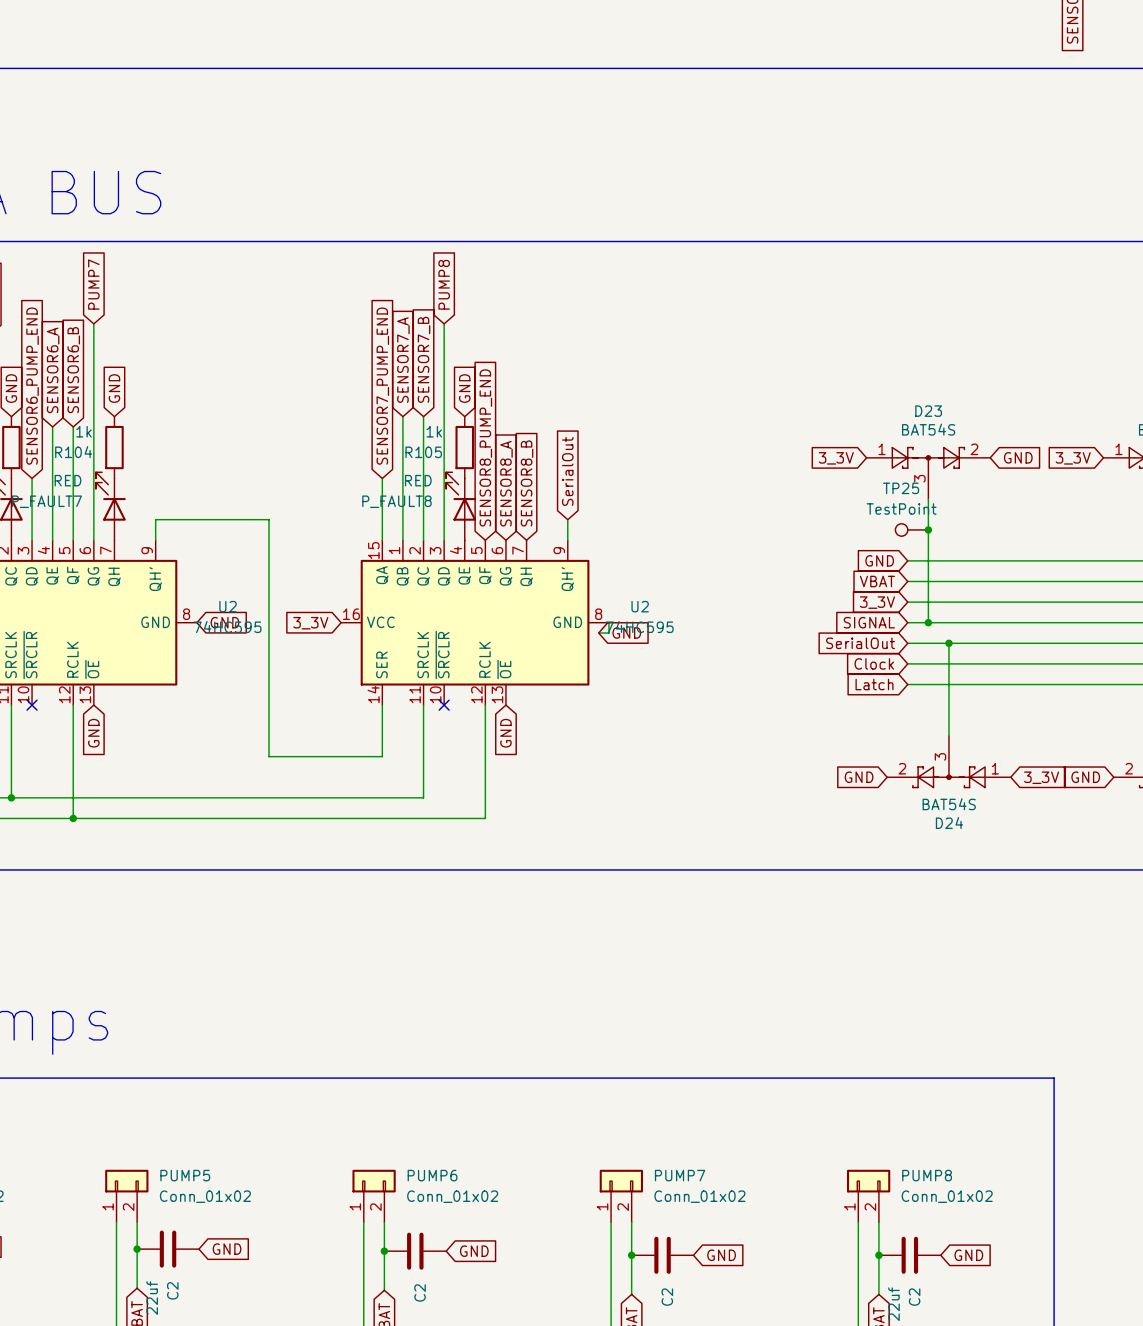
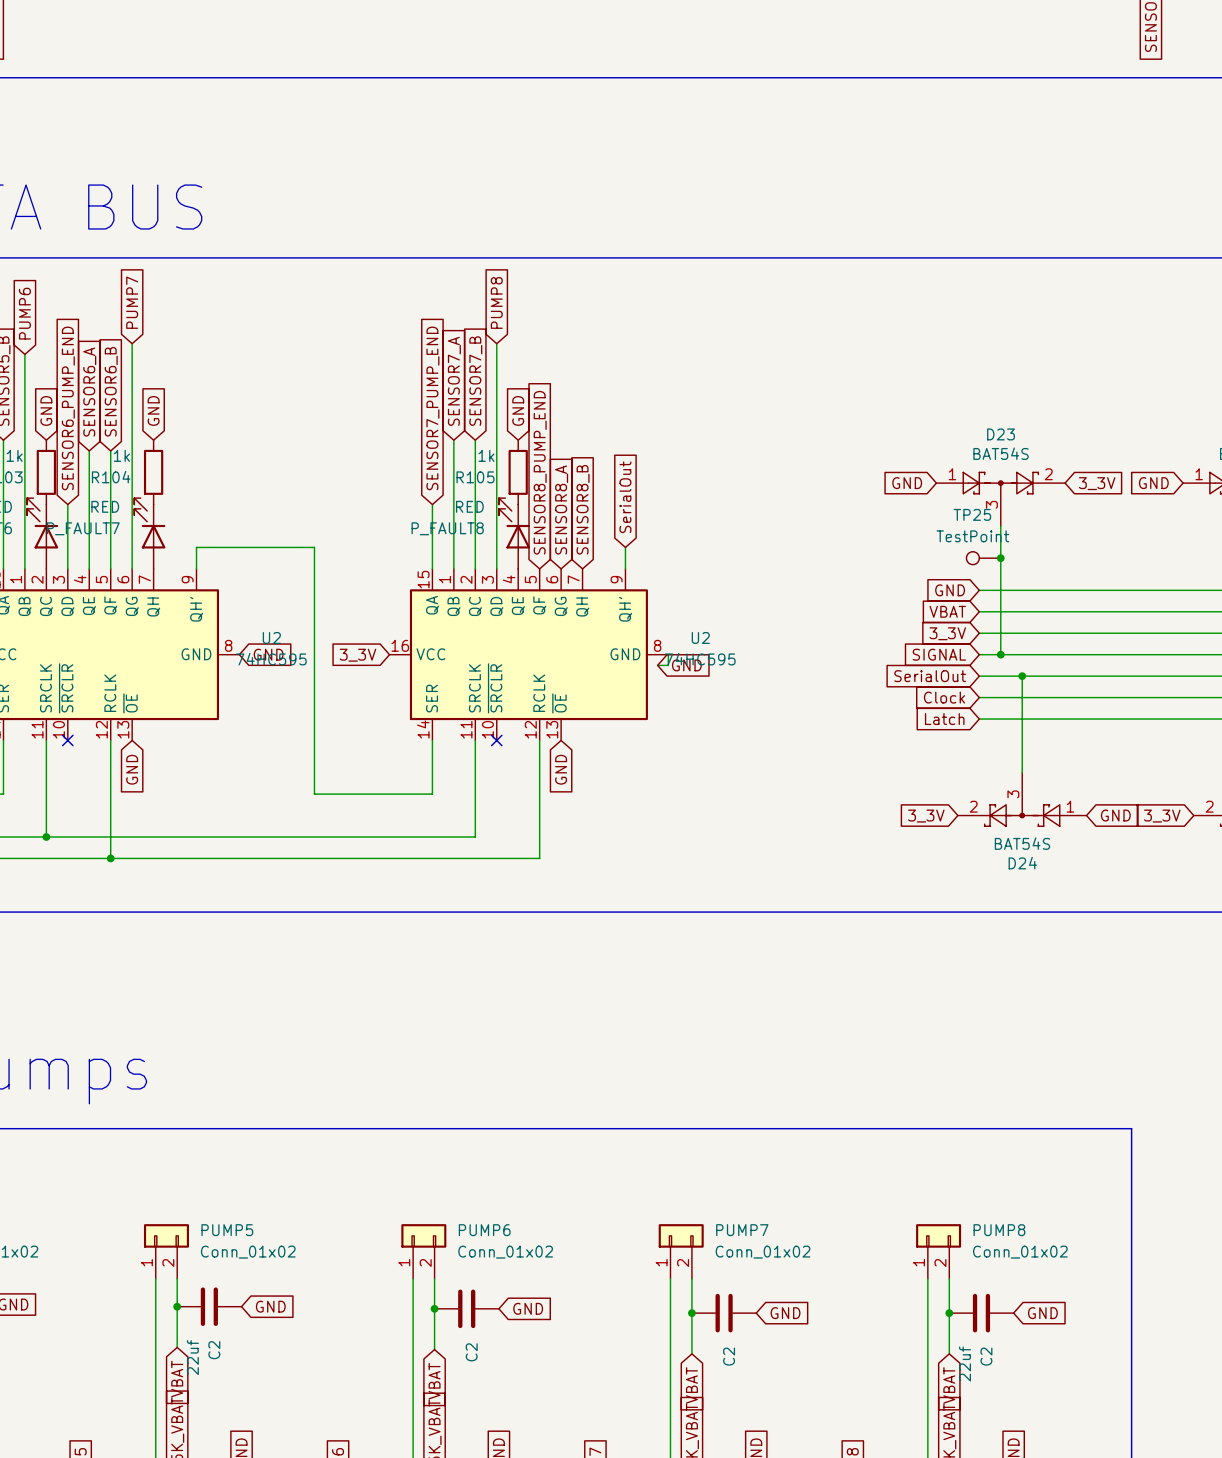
global label: GND (1018, 457) -> 3_3V (1097, 483)
global label: 3_3V (836, 458) -> GND (907, 483)
global label: 3_3V (1073, 458) -> GND (1153, 483)
global label: GND (859, 777) -> 3_3V (926, 816)
global label: 3_3V (1041, 777) -> GND (1115, 815)
global label: GND (1085, 777) -> 3_3V (1162, 816)

